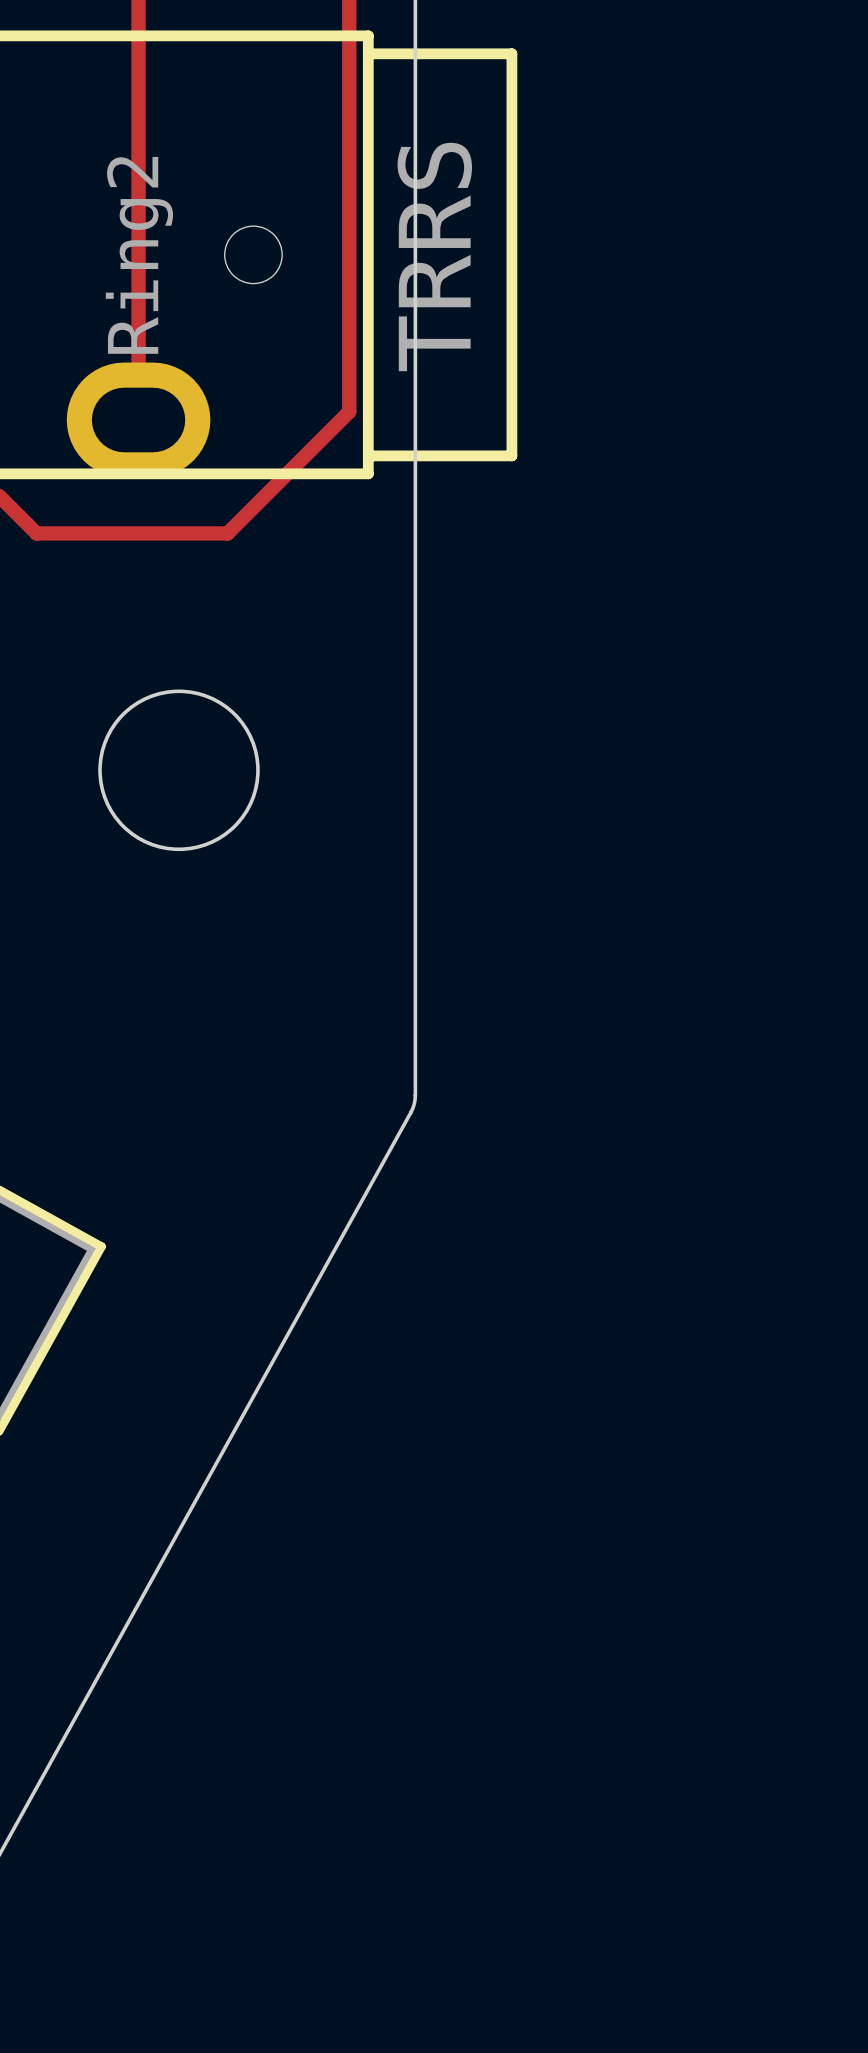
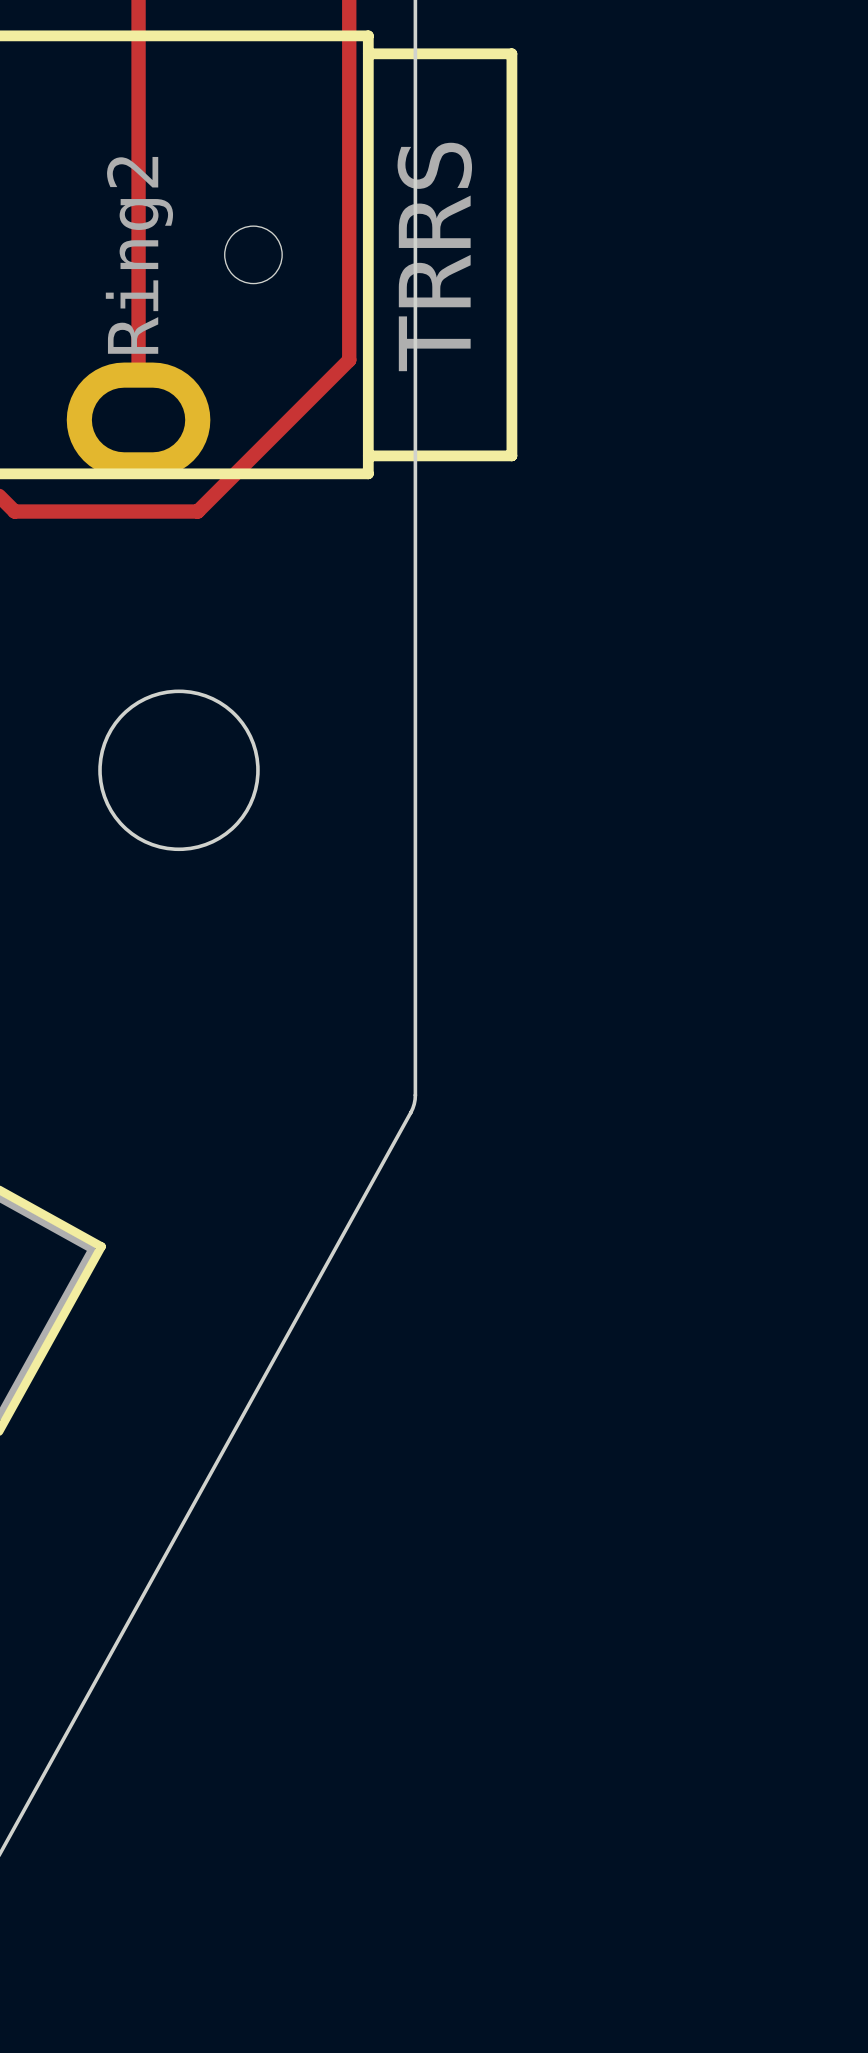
track: (349, 360) (349, 411) (227, 533) (36, 533) (14, 511) -> (349, 360) (197, 511) (14, 511)

